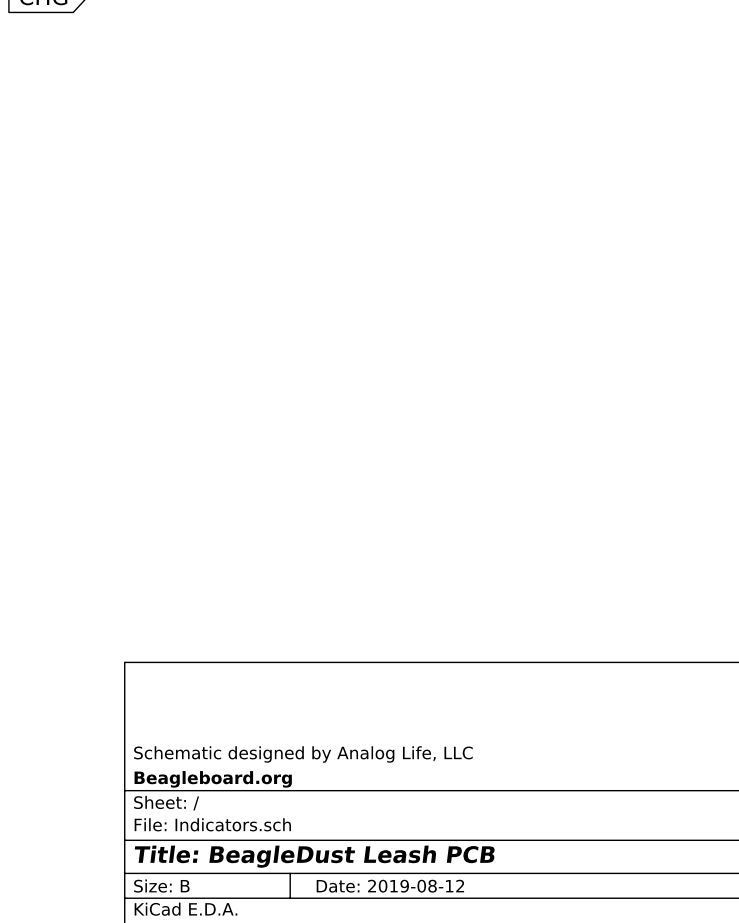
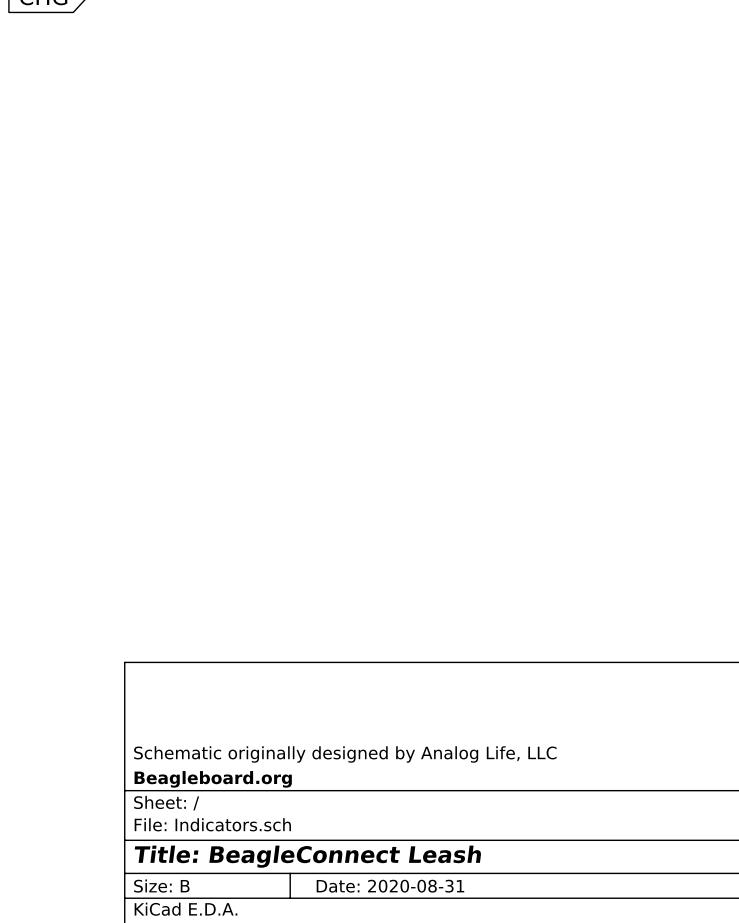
title block: Schematic designed by Analog Life, LLC (303, 754) -> Schematic originally designed by Analog Life, LLC (345, 754)
title block: Title: BeagleDust Leash PCB (314, 856) -> Title: BeagleConnect Leash (307, 856)
title block: Date: 2019-08-12 (390, 886) -> Date: 2020-08-31 (390, 886)

